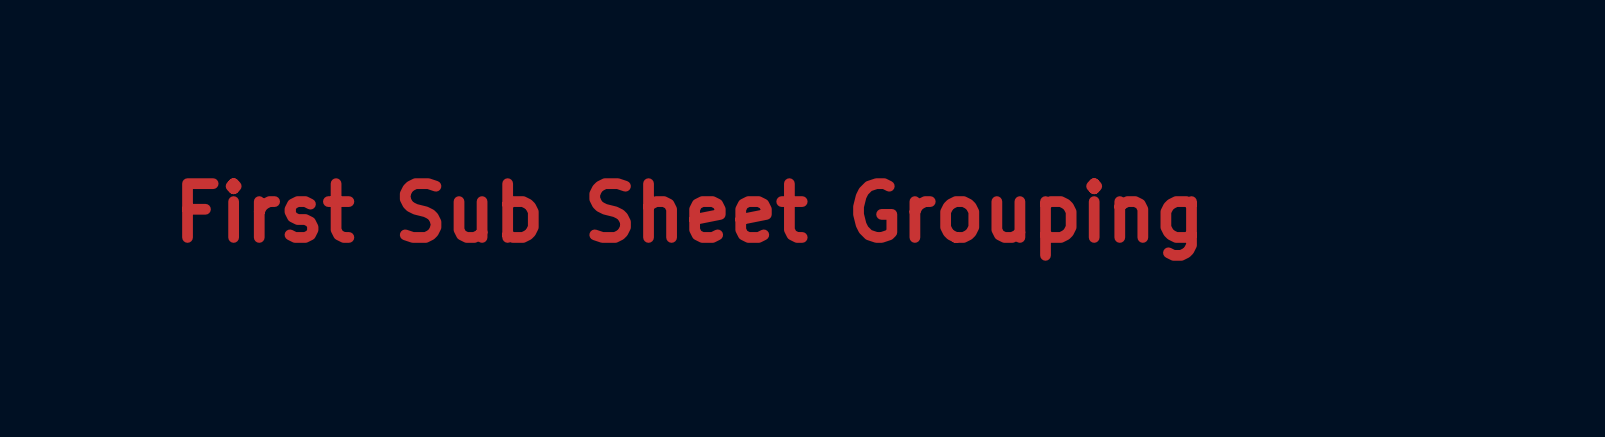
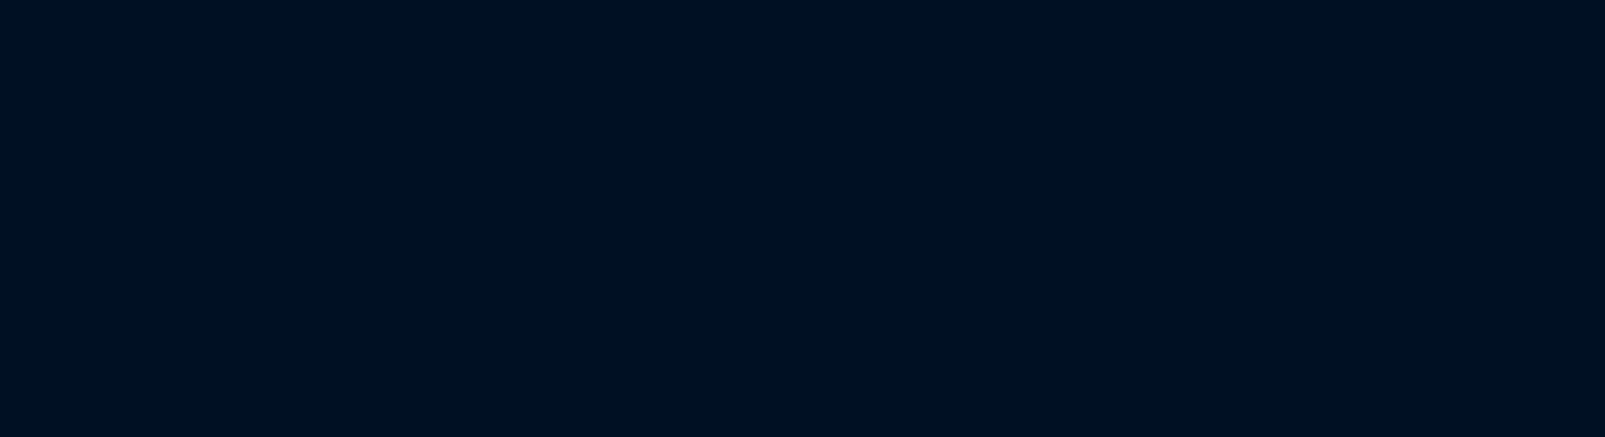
text: First Sub Sheet Grouping (689, 219) -> none

